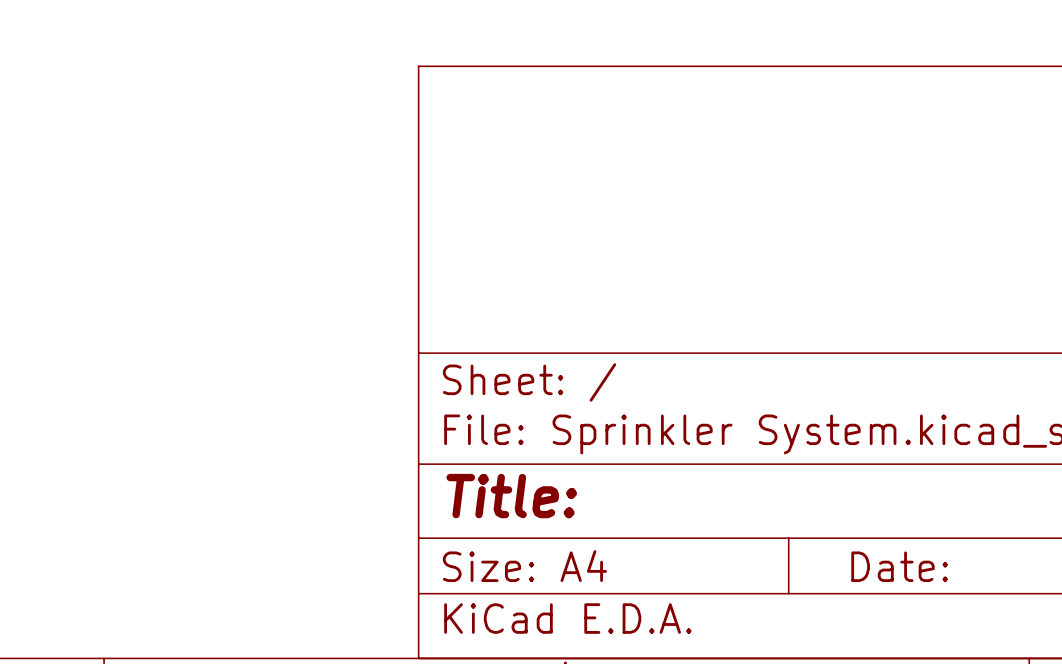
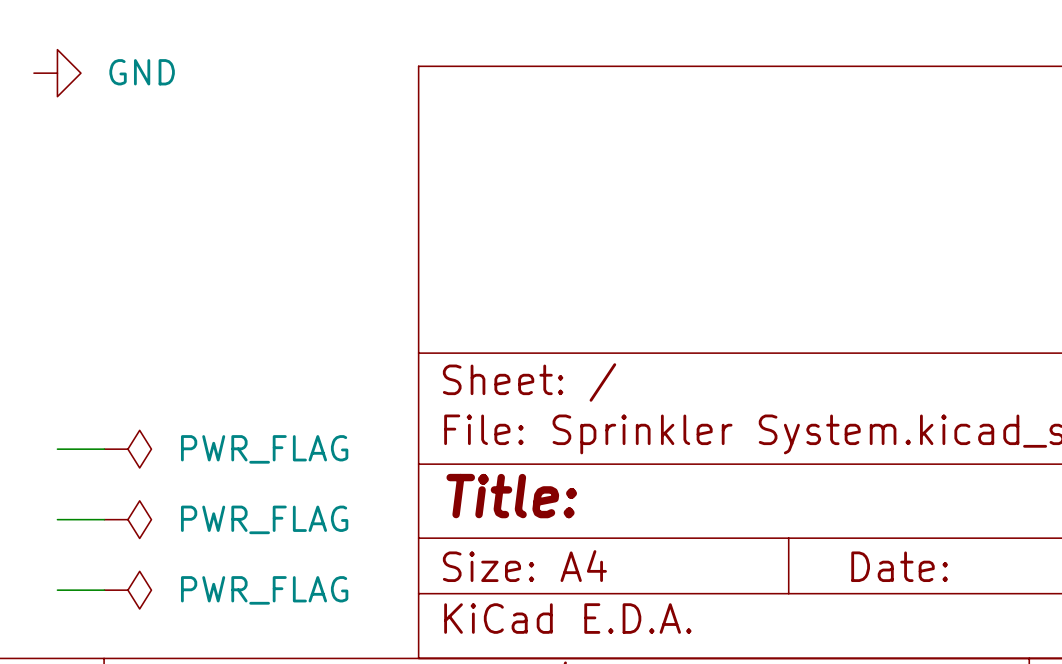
power symbol: none -> GND (57, 73)
wire: none -> (57, 449) (104, 449)
power symbol: none -> PWR_FLAG (127, 449)
wire: none -> (57, 519) (104, 519)
power symbol: none -> PWR_FLAG (127, 519)
wire: none -> (57, 590) (104, 590)
power symbol: none -> PWR_FLAG (127, 590)

